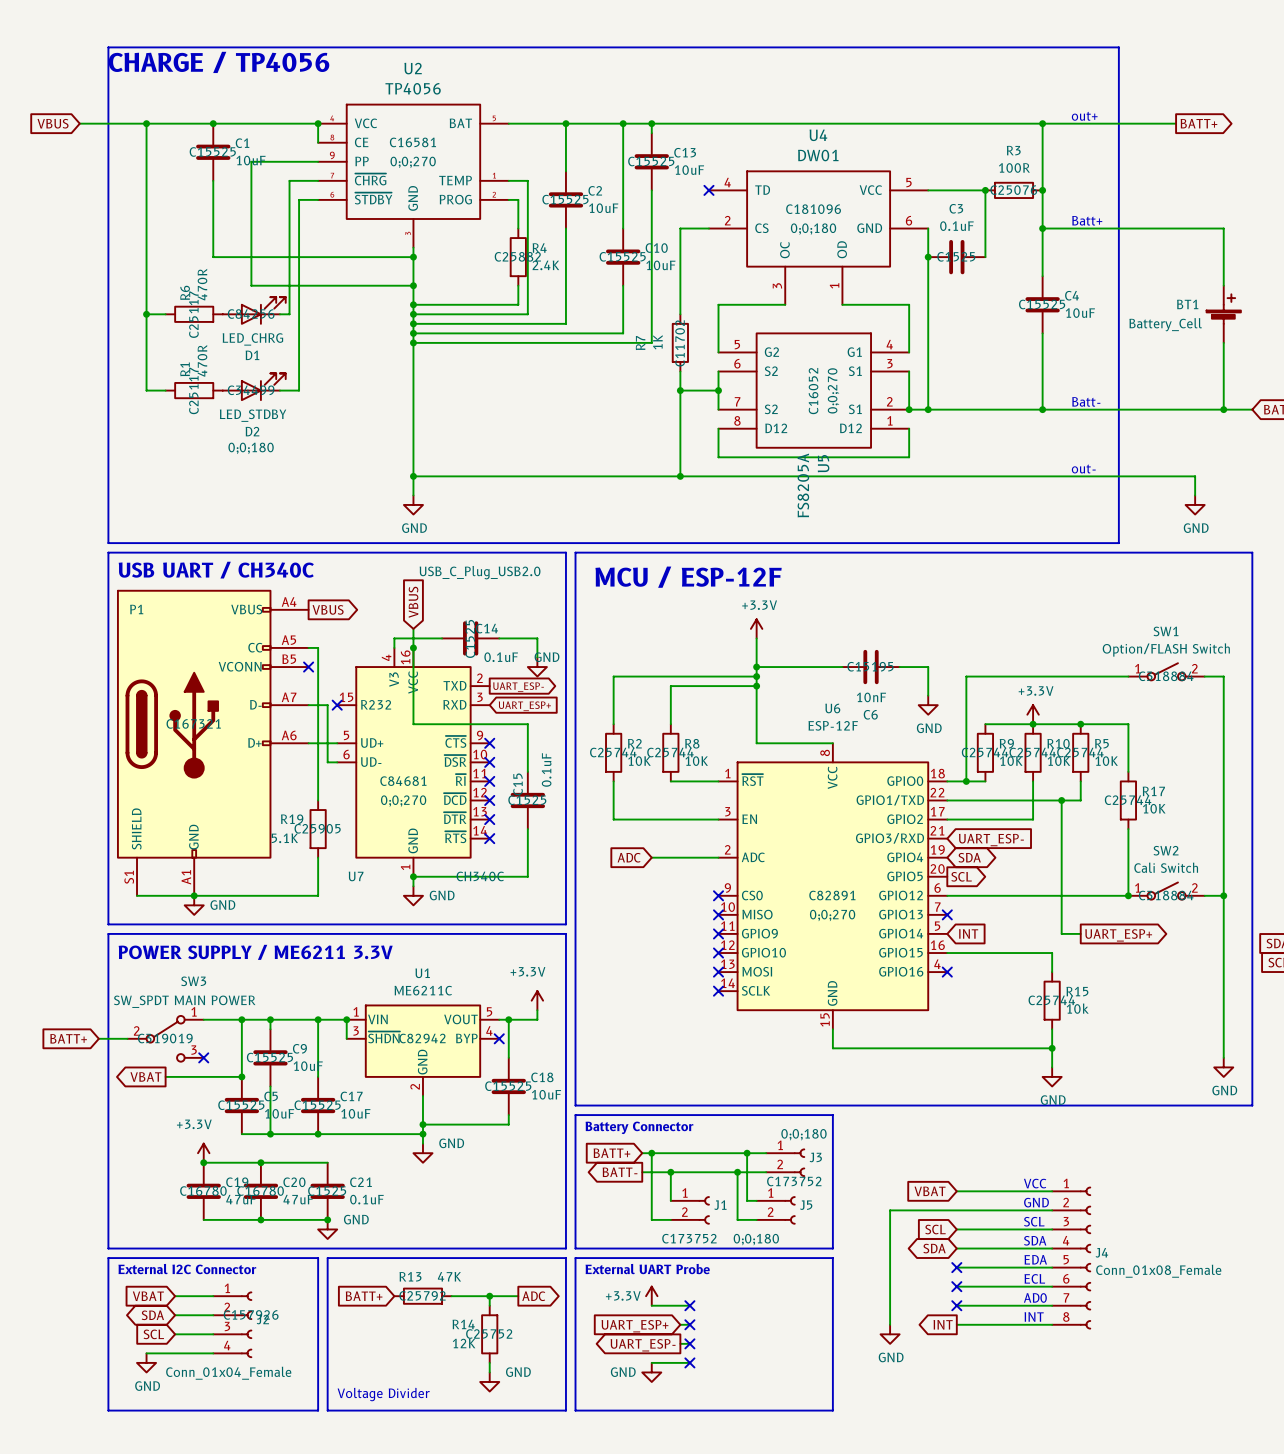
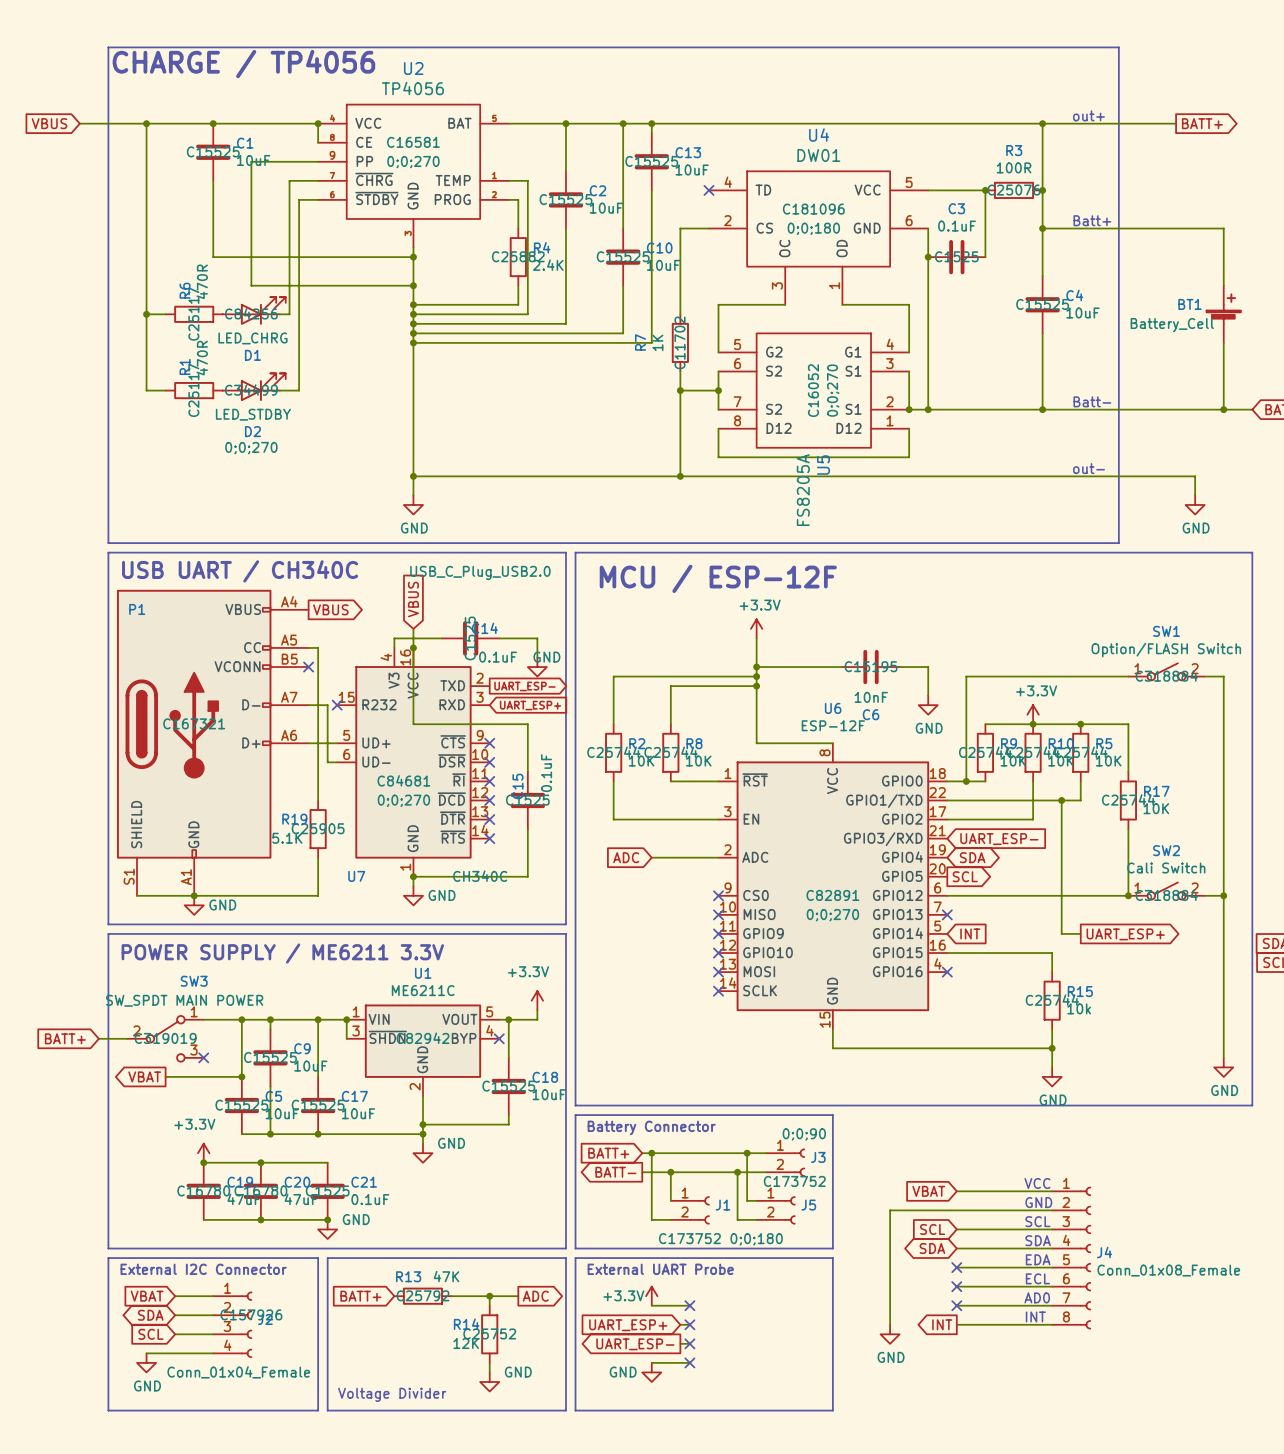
D2 text: 0;0;180 (251, 448) -> 0;0;270 (251, 448)
J3 text: 0;0;180 (803, 1134) -> 0;0;90 (804, 1134)

